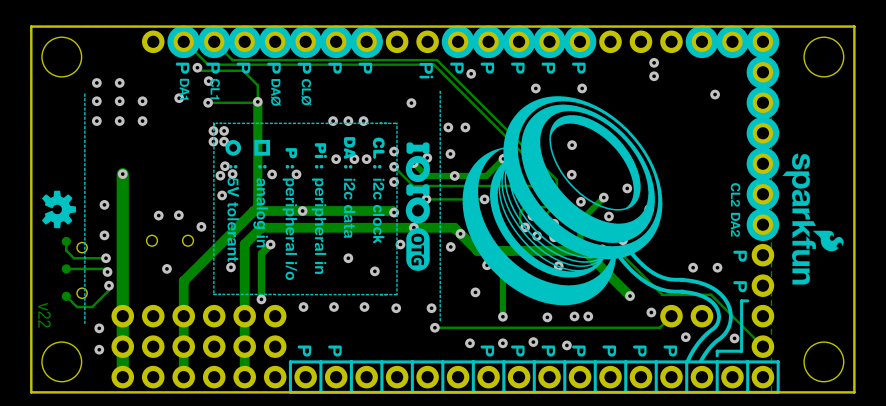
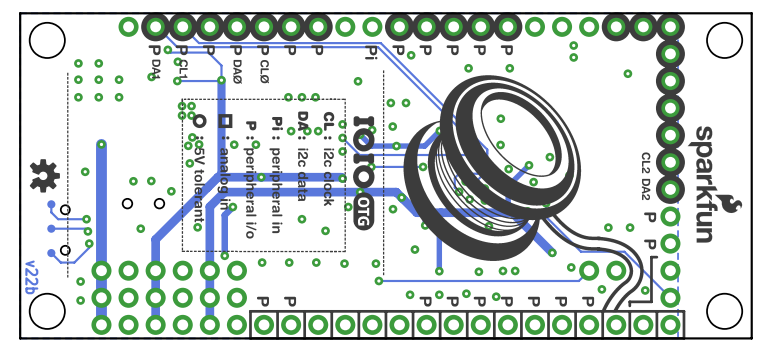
via: (104, 235) -> none
text: v22 (44, 315) -> v22b (31, 277)

